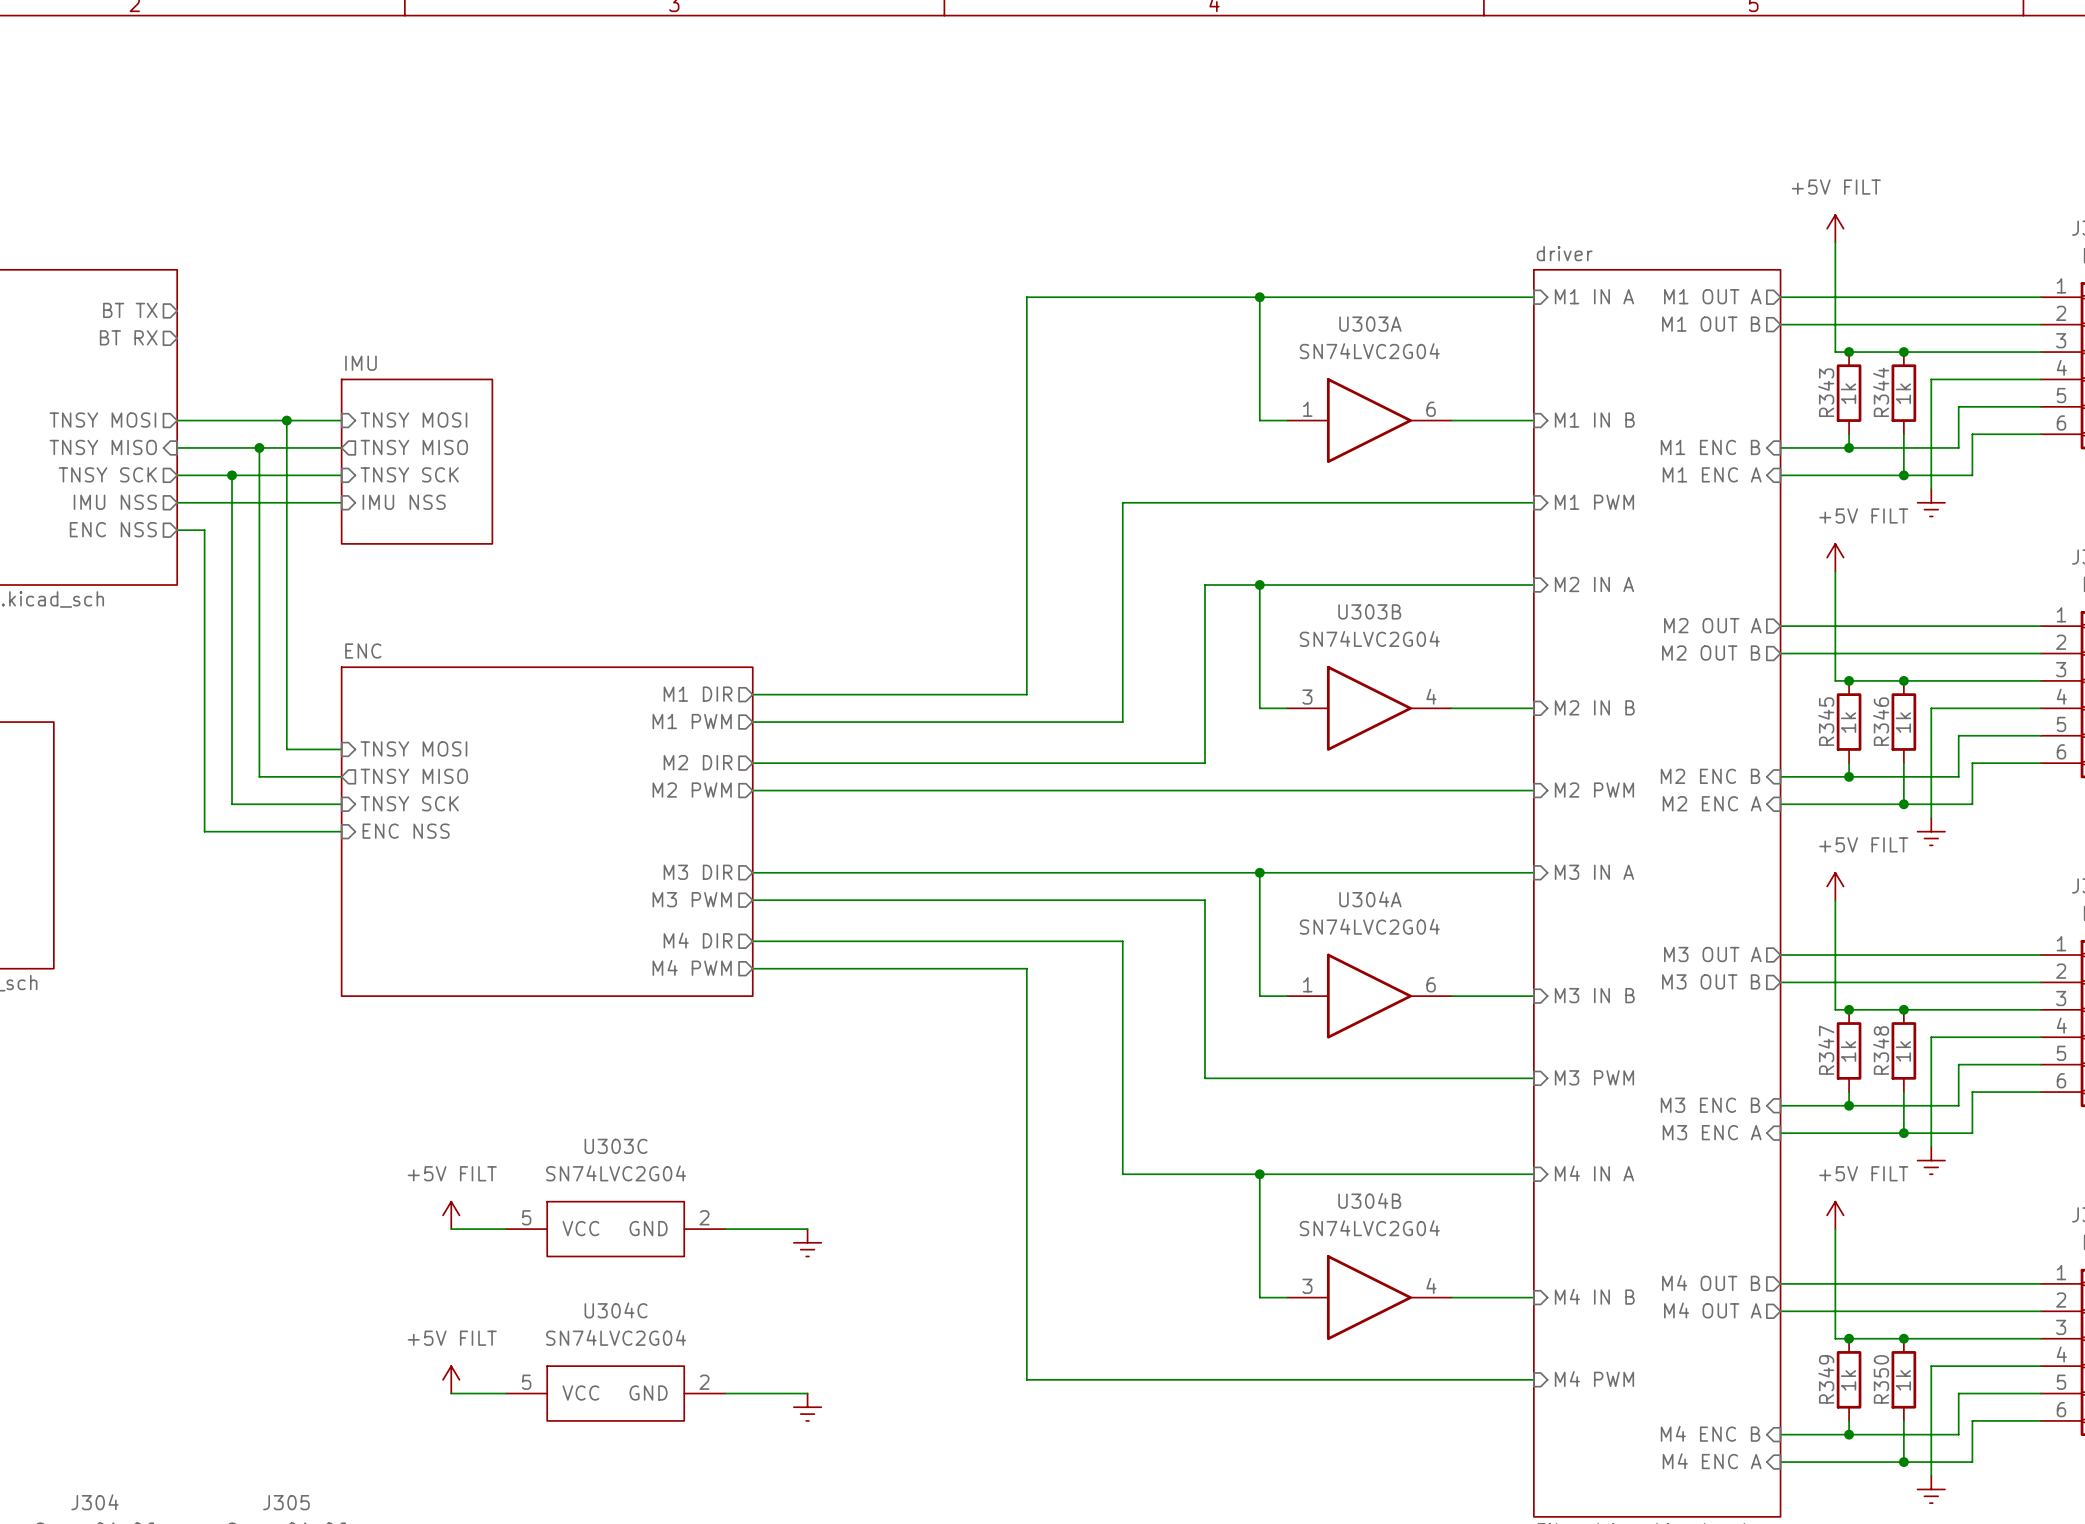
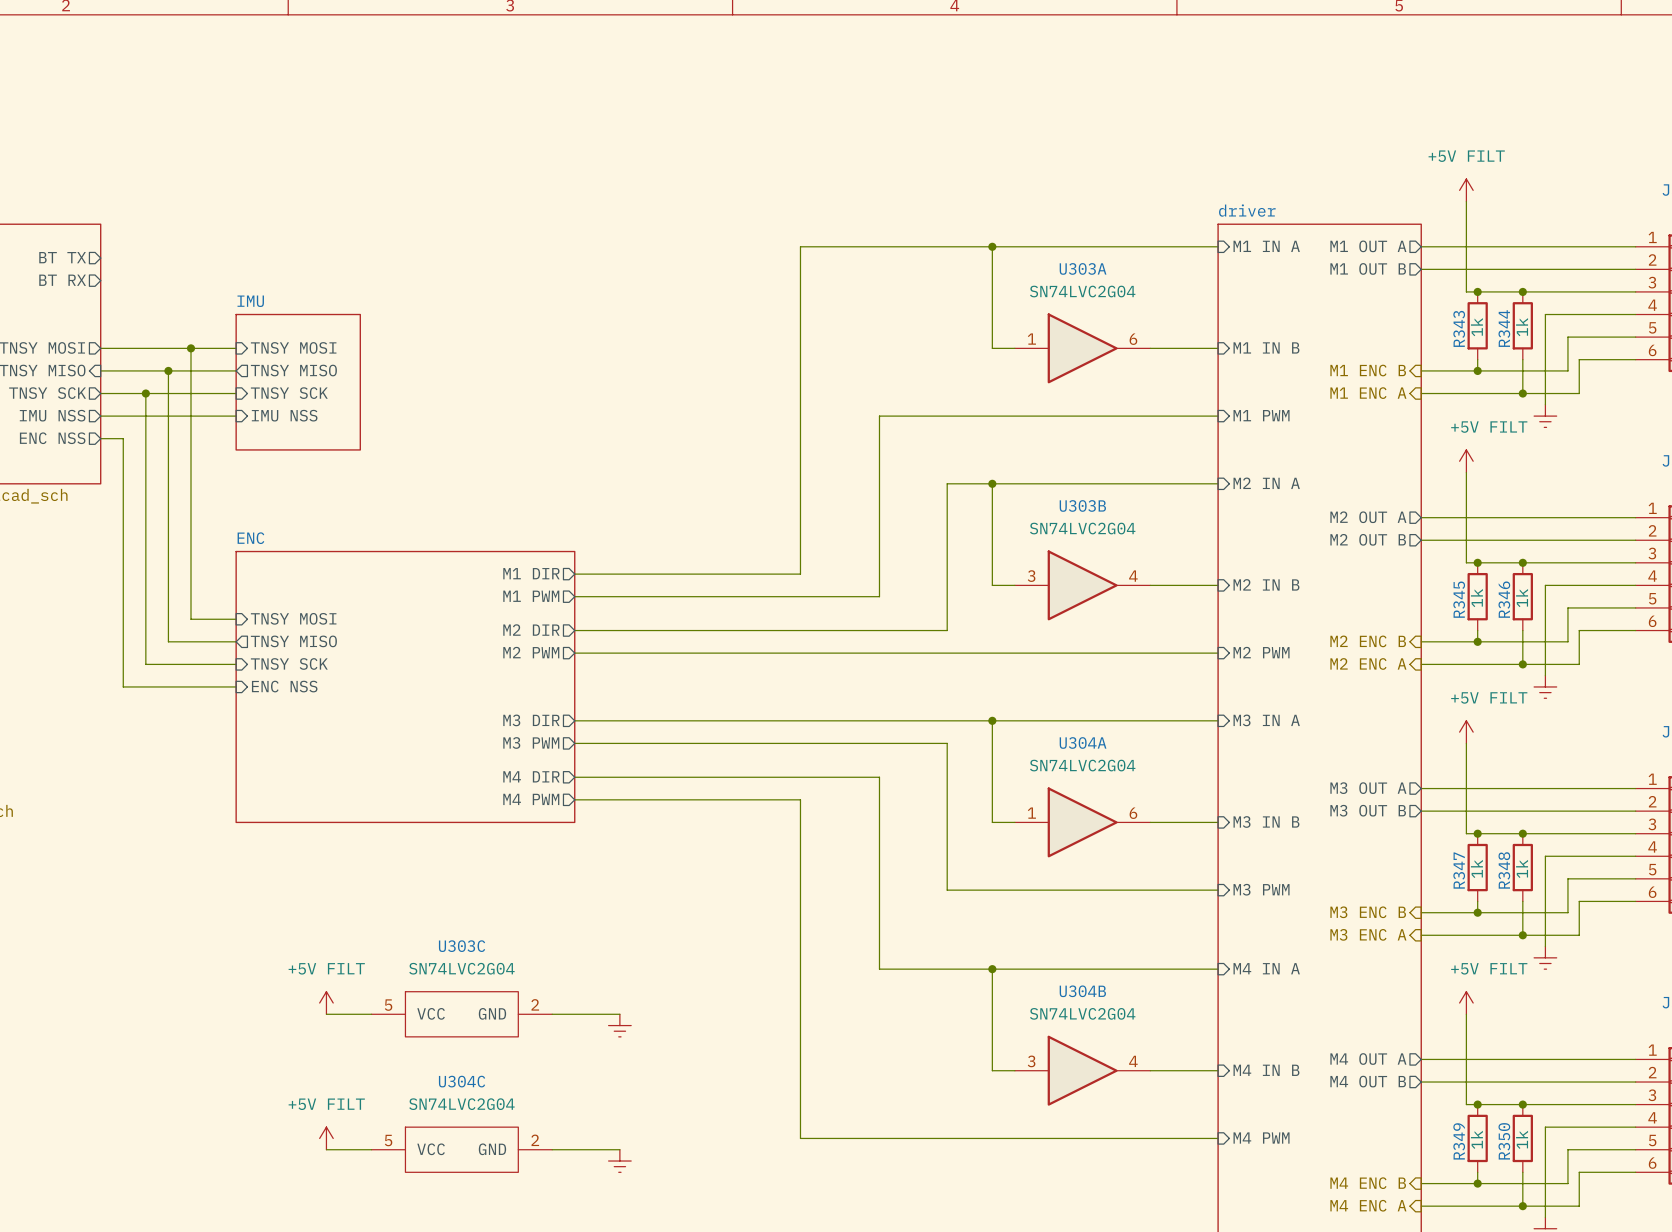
sheet pin: M4 OUT B (1711, 1283) -> M4 OUT A (1368, 1059)
sheet pin: M4 OUT A (1712, 1310) -> M4 OUT B (1368, 1081)

